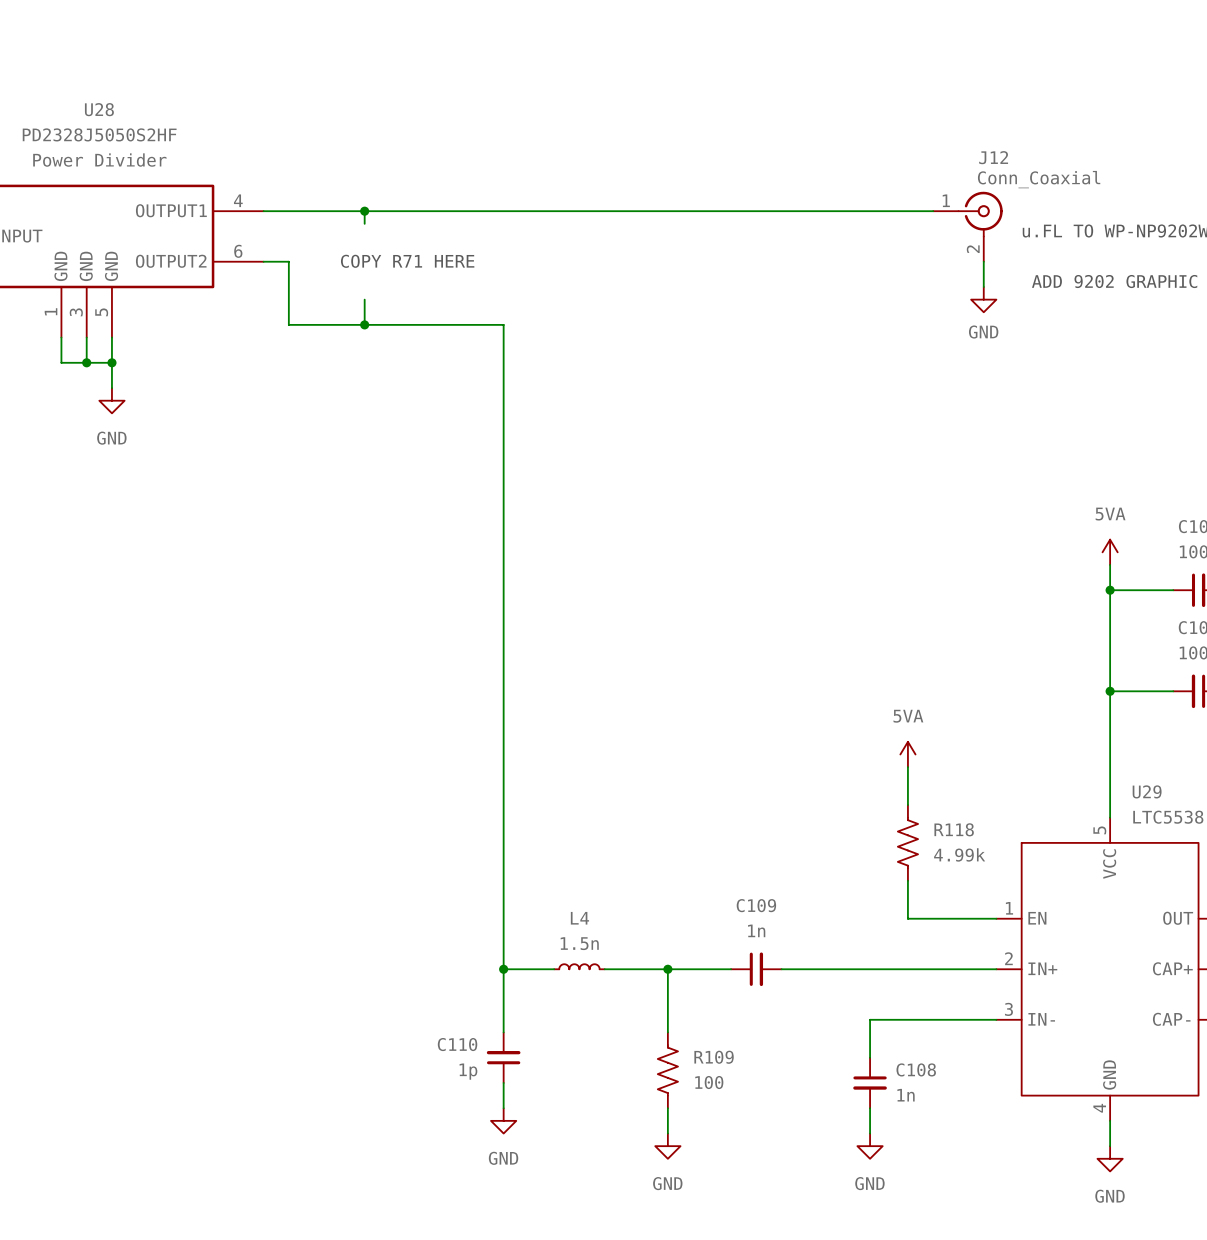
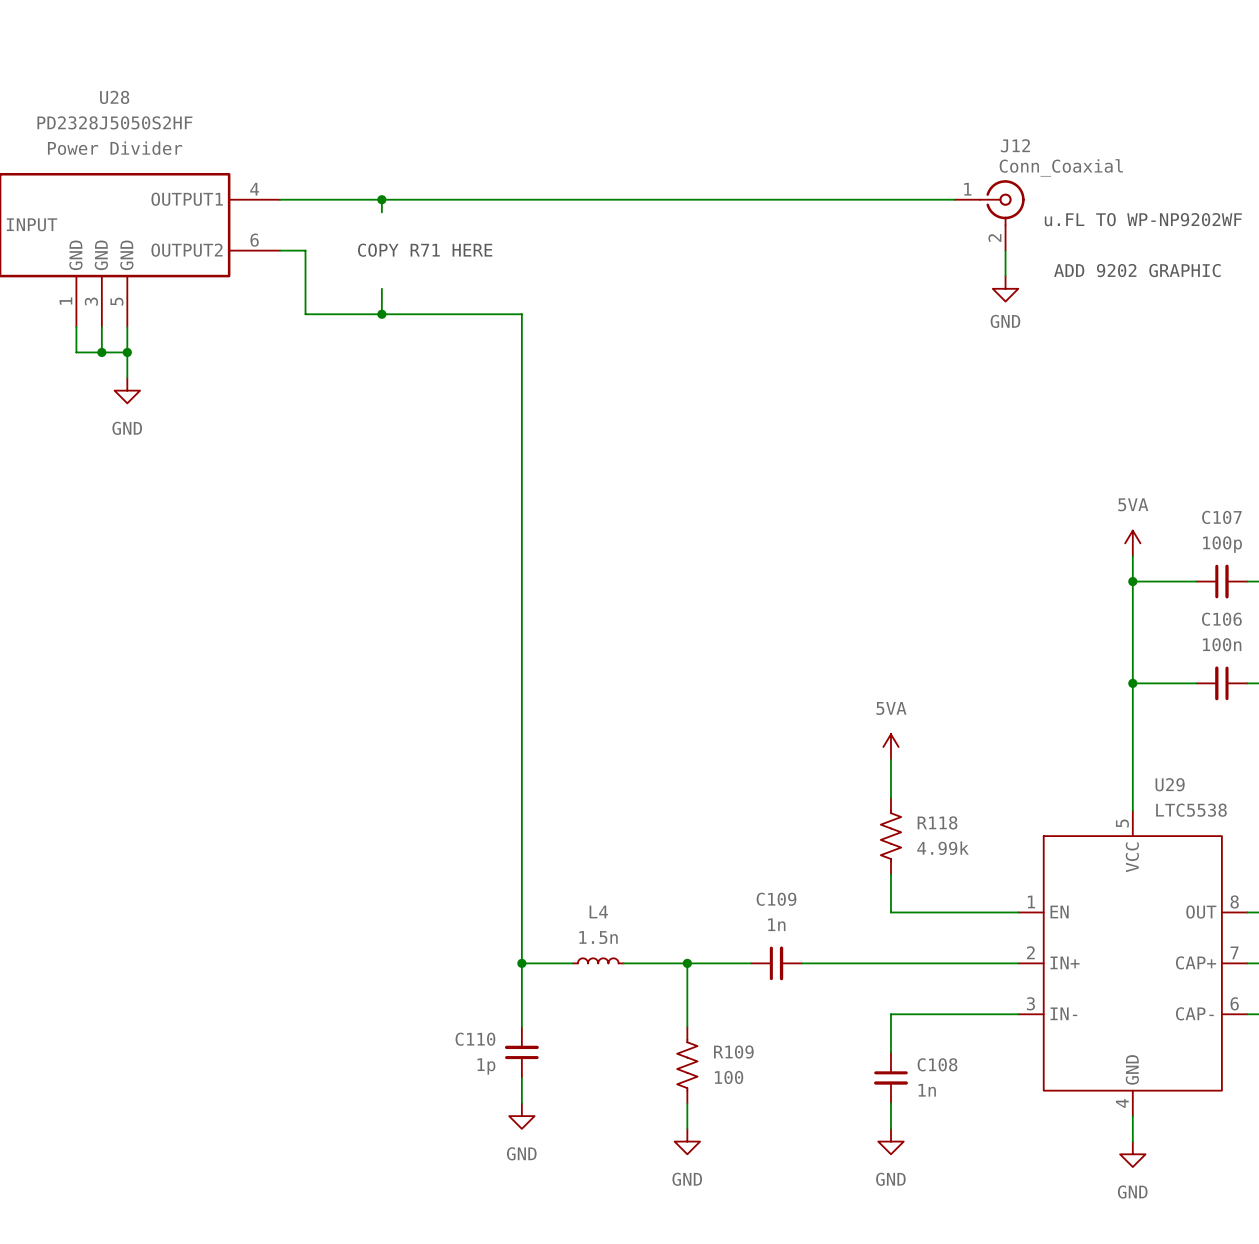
power symbol position: 5VA (907, 754) -> 5VA (890, 747)
wire: (907, 767) (907, 805) -> (890, 759) (890, 797)
R118 position: (907, 842) -> (890, 836)
wire: (907, 880) (907, 918) -> (890, 874) (890, 912) (929, 912)

